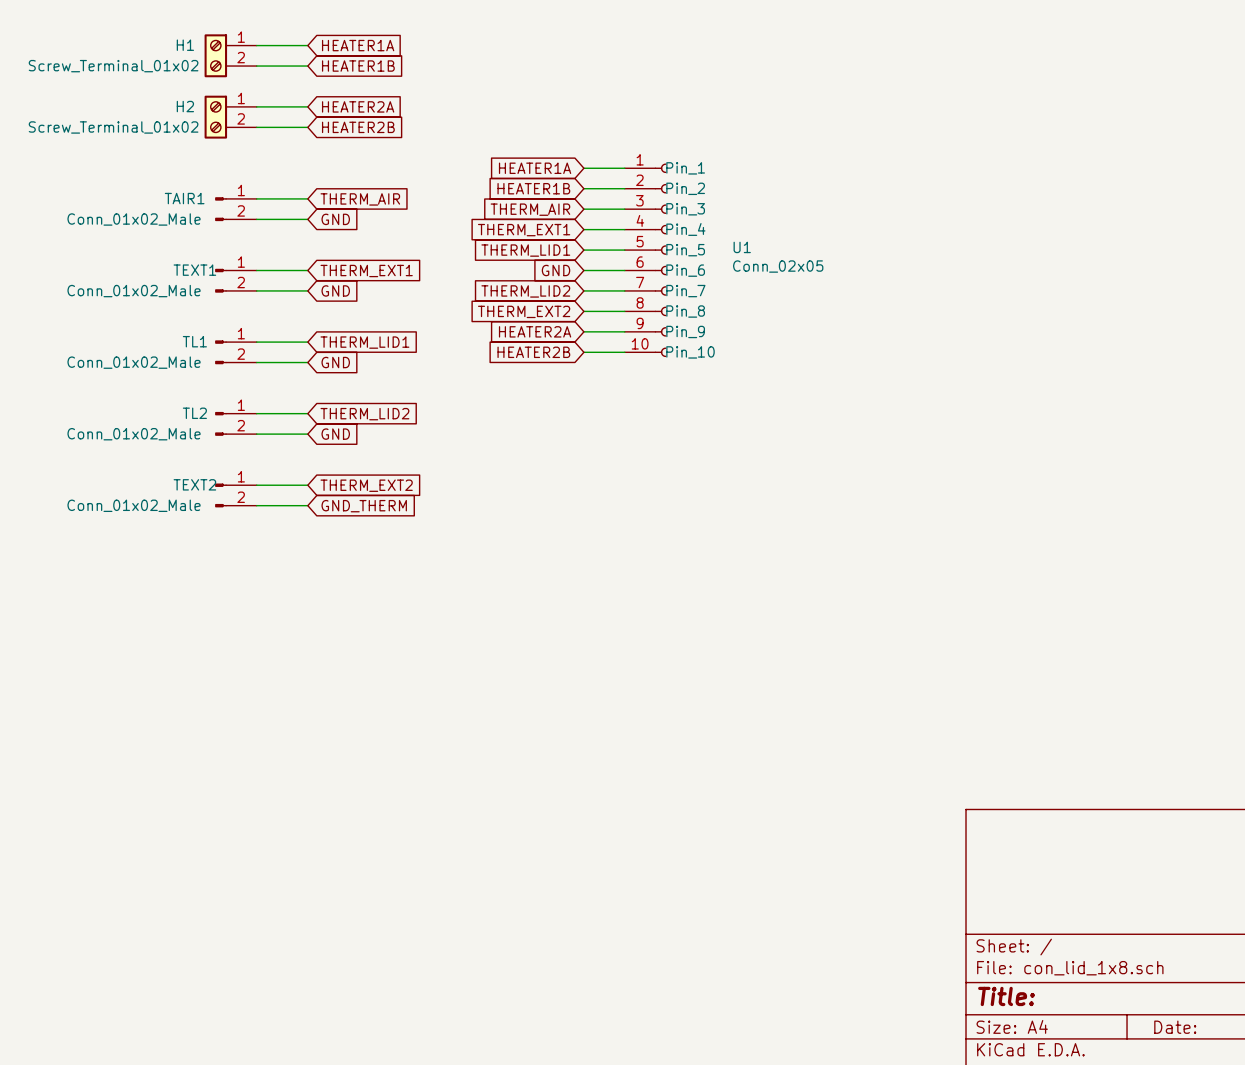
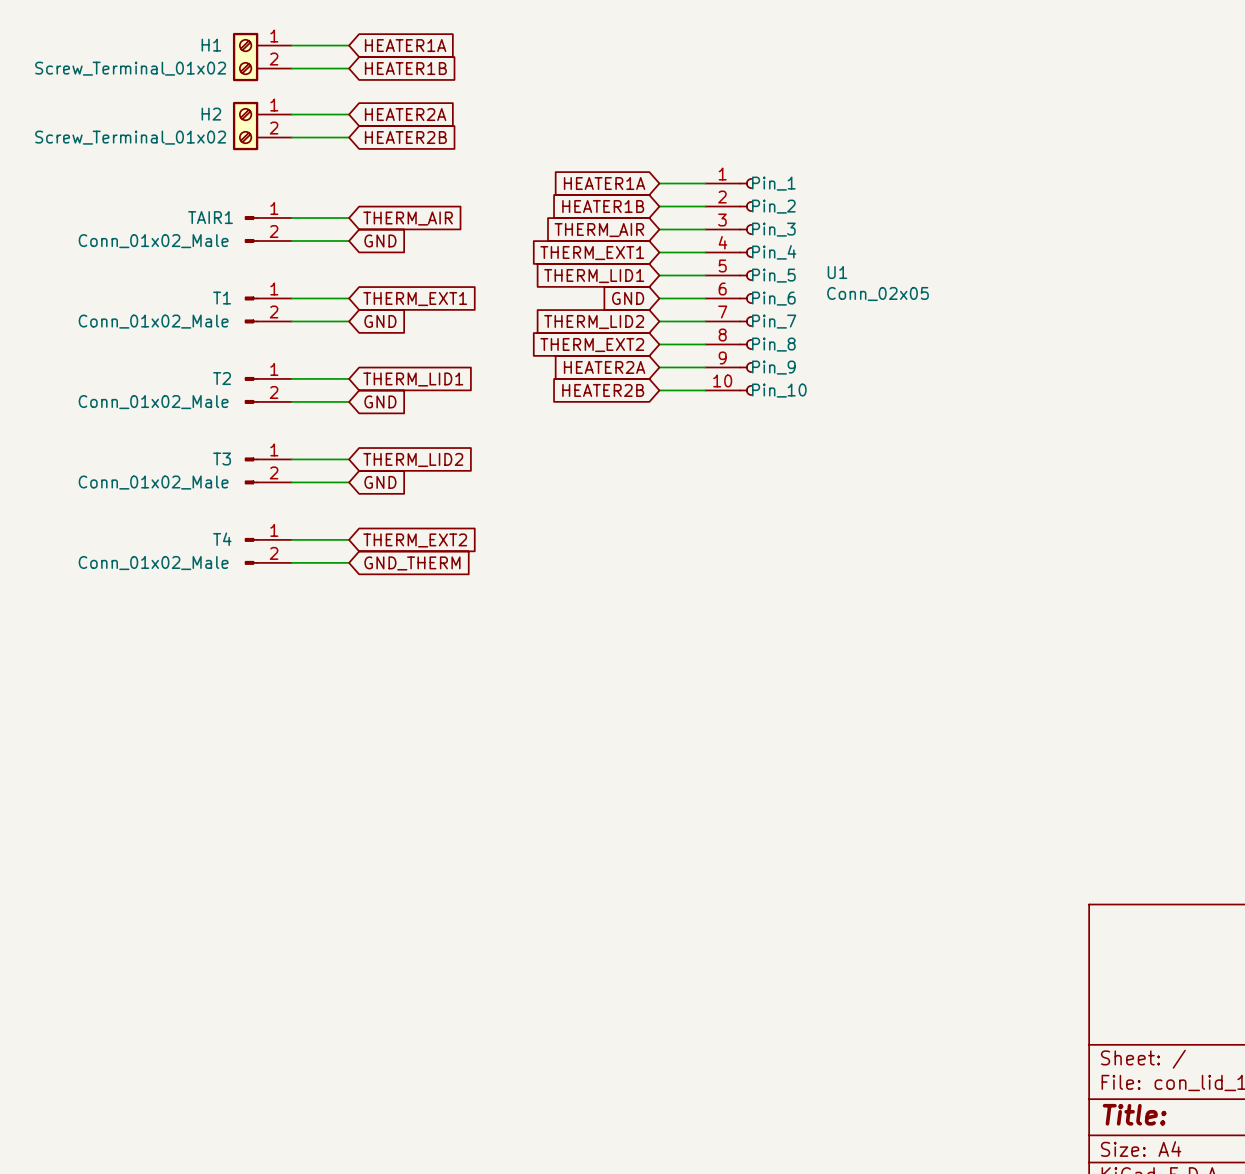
TEXT1 name: TEXT1 (194, 270) -> T1 (222, 298)
TL1 name: TL1 (194, 341) -> T2 (222, 378)
TL2 name: TL2 (194, 413) -> T3 (222, 459)
TEXT2 name: TEXT2 (194, 484) -> T4 (222, 539)

